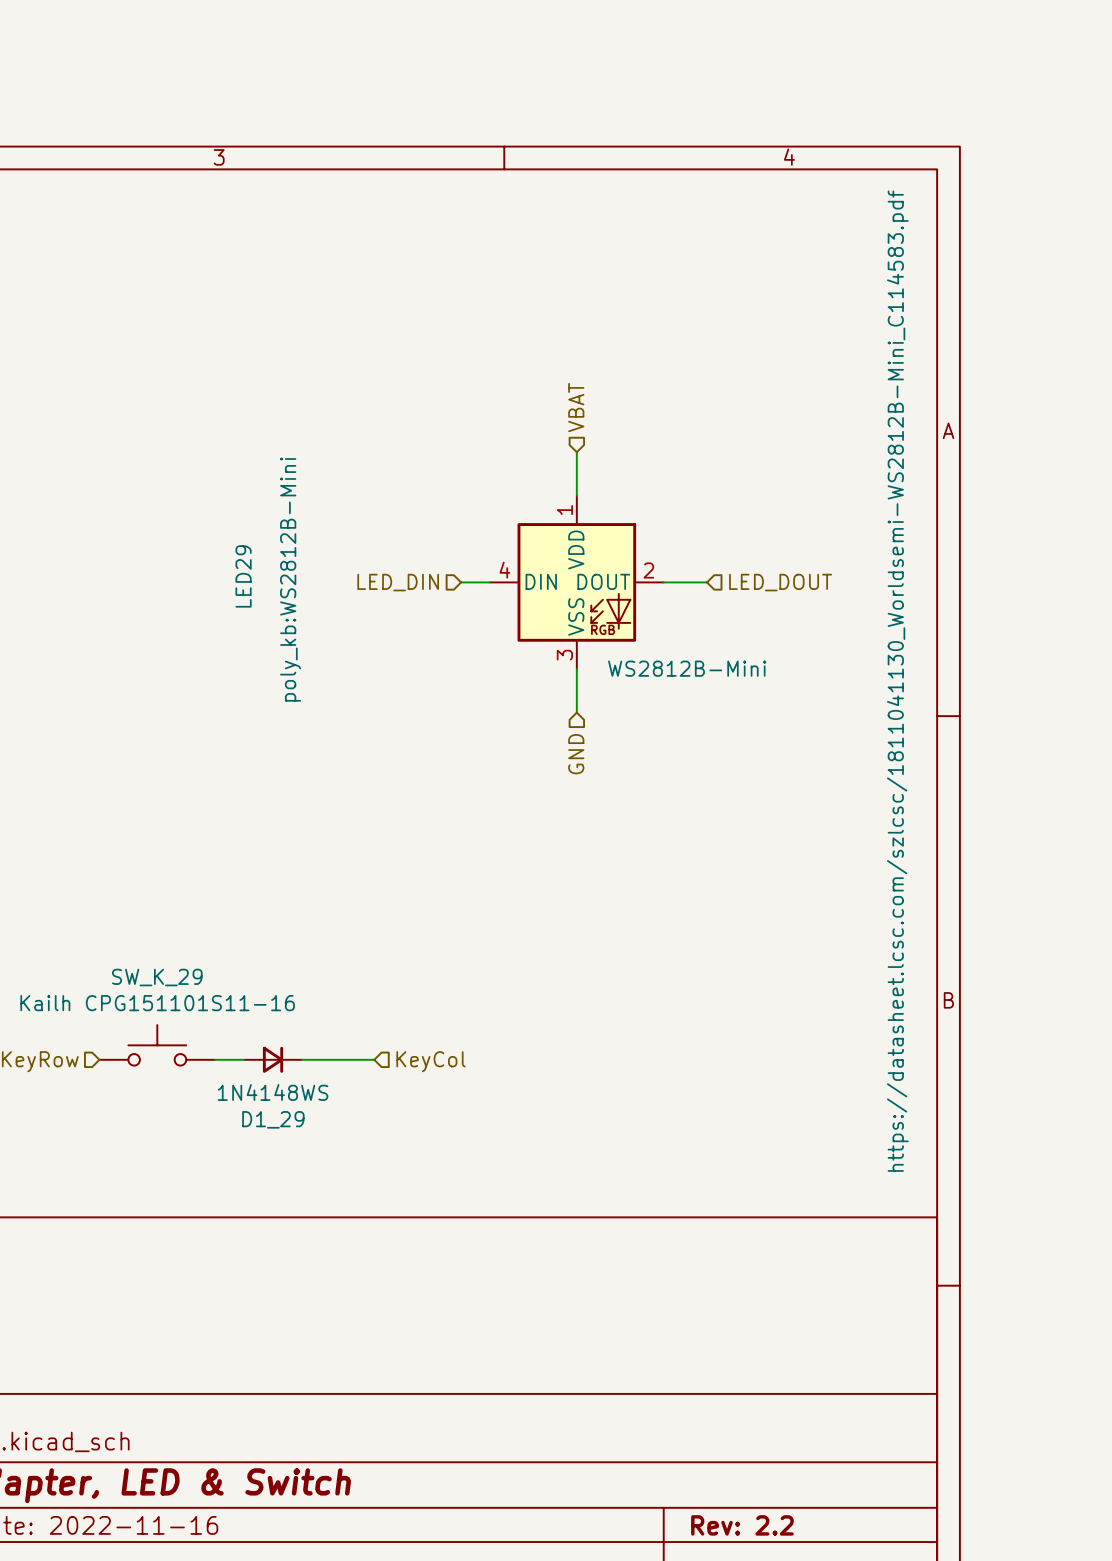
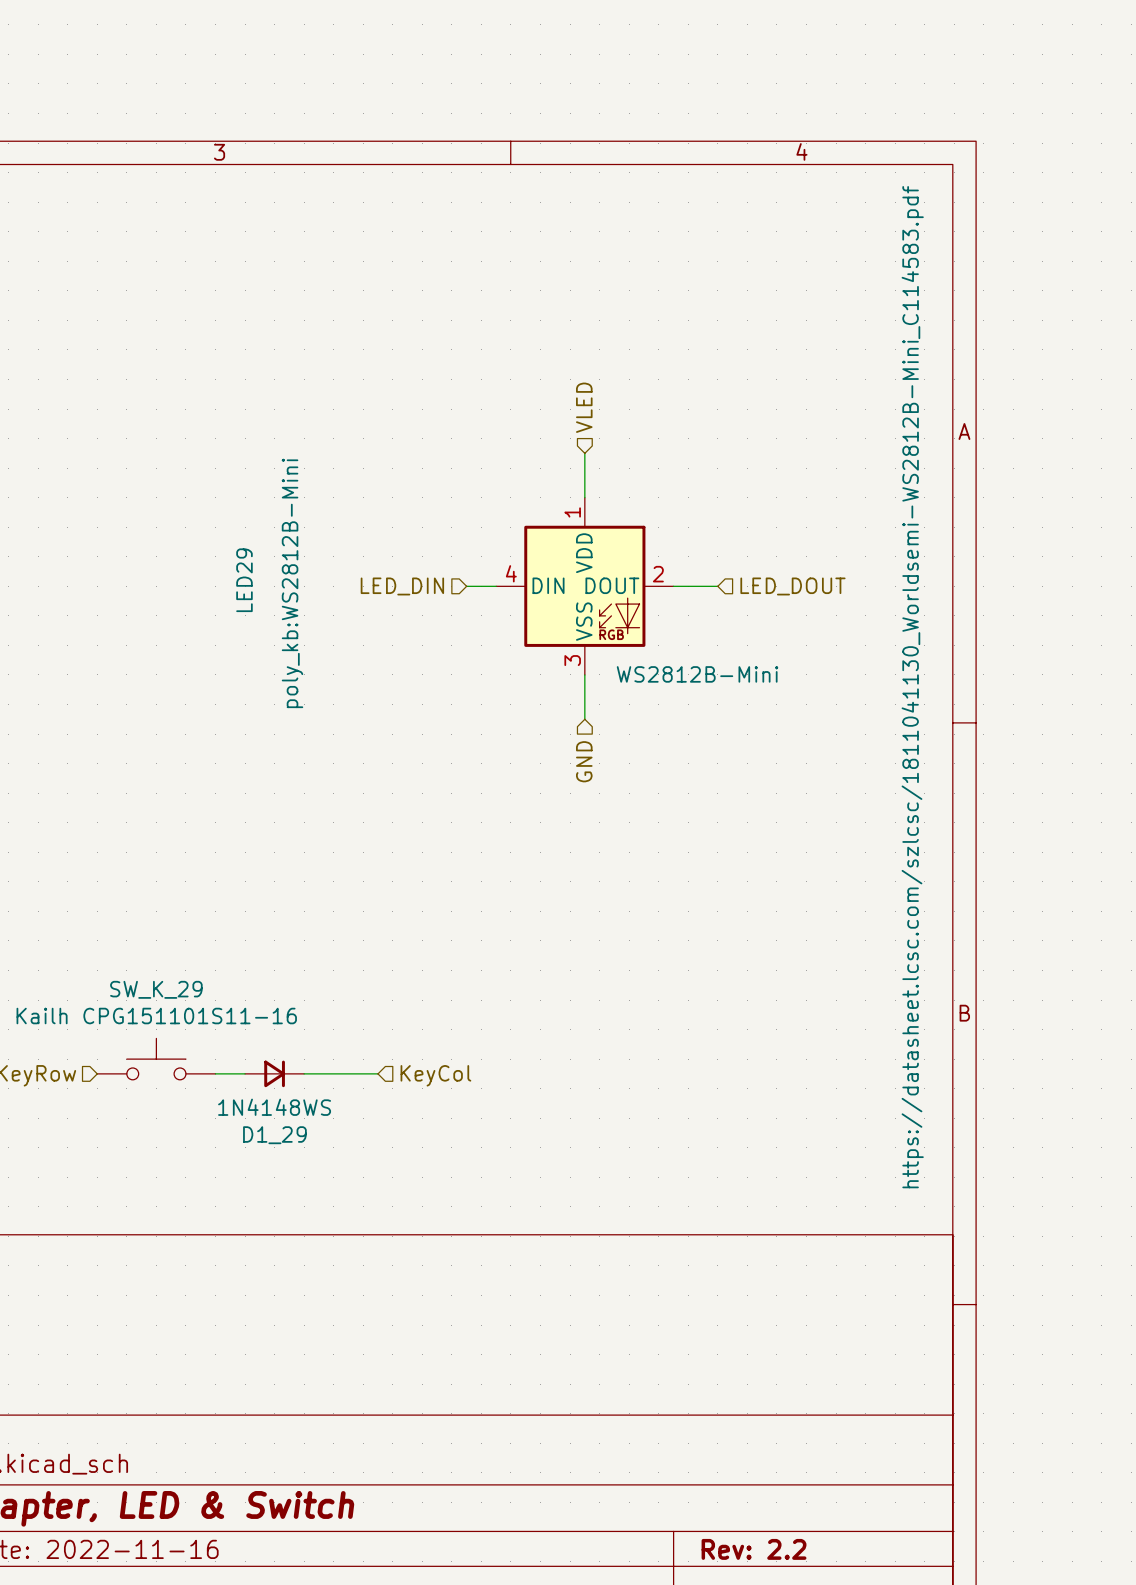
hierarchical label: VBAT (576, 407) -> VLED (584, 407)

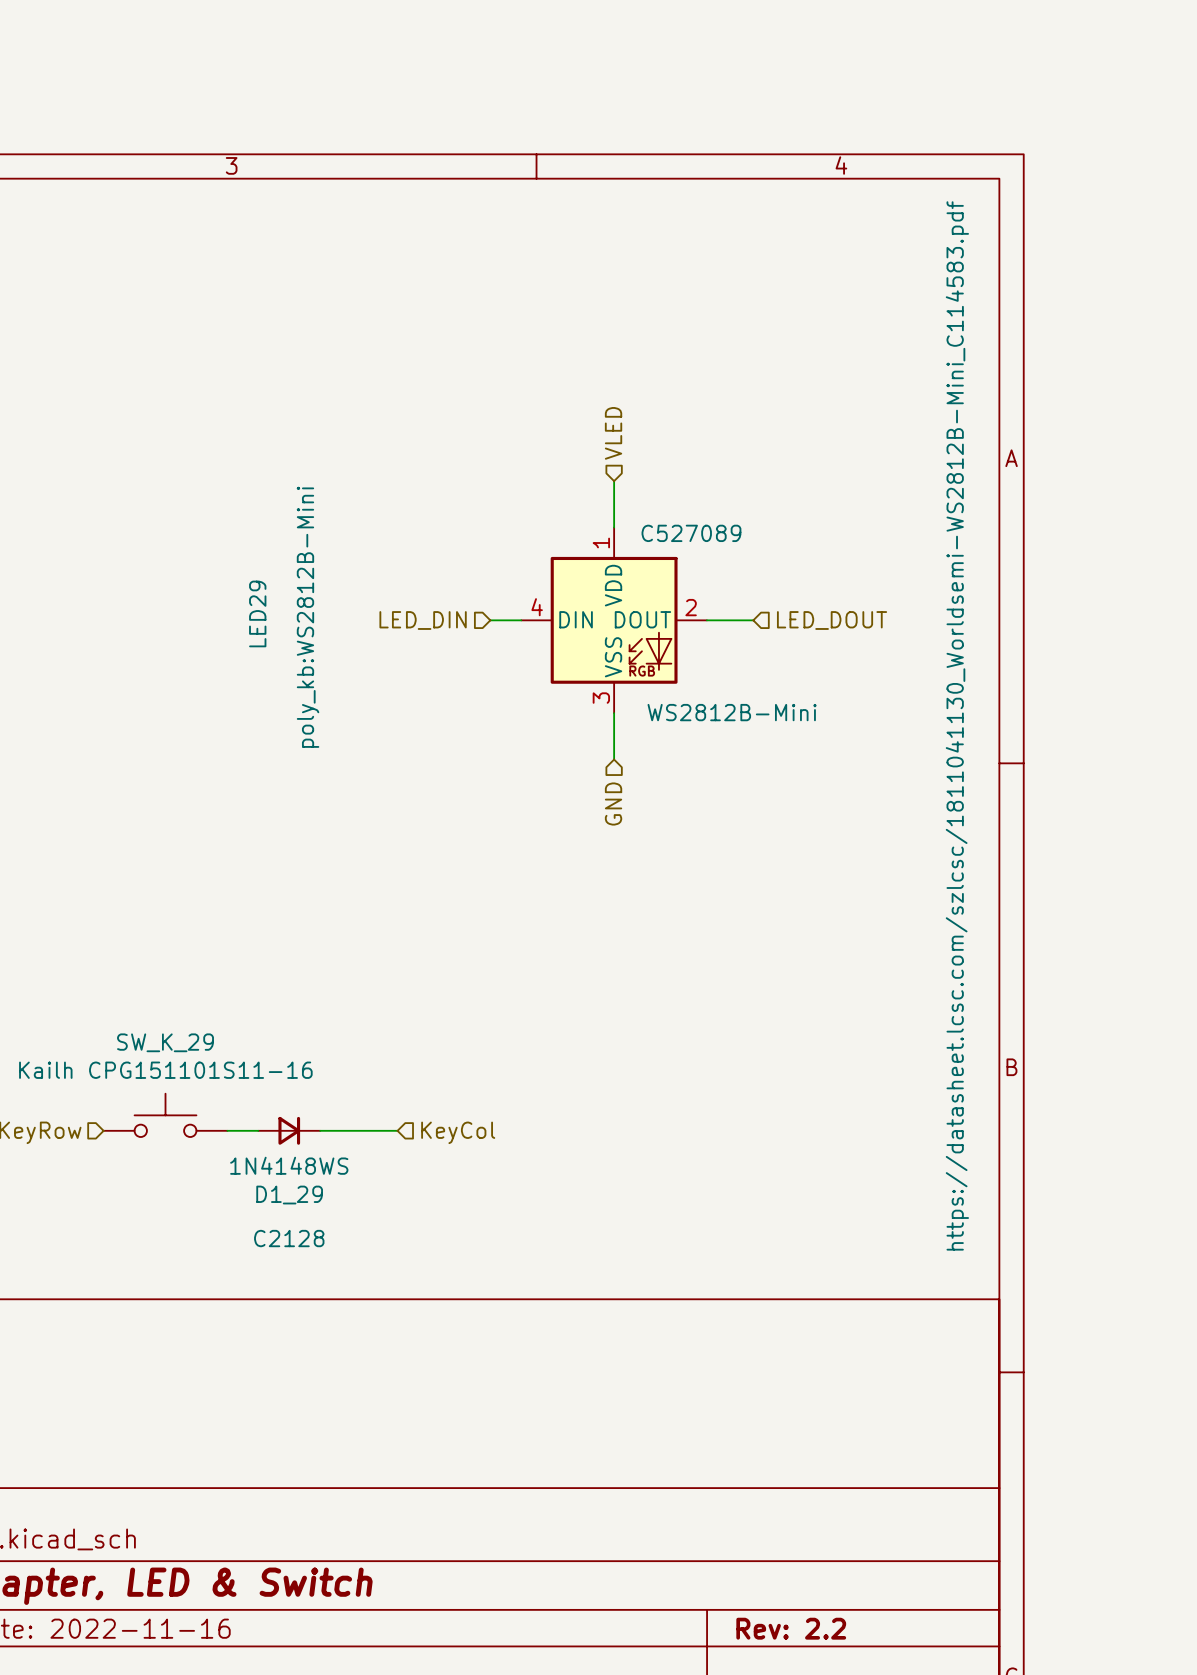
LED29 text: none -> C527089 (691, 533)
D1_29 text: none -> C2128 (289, 1238)

